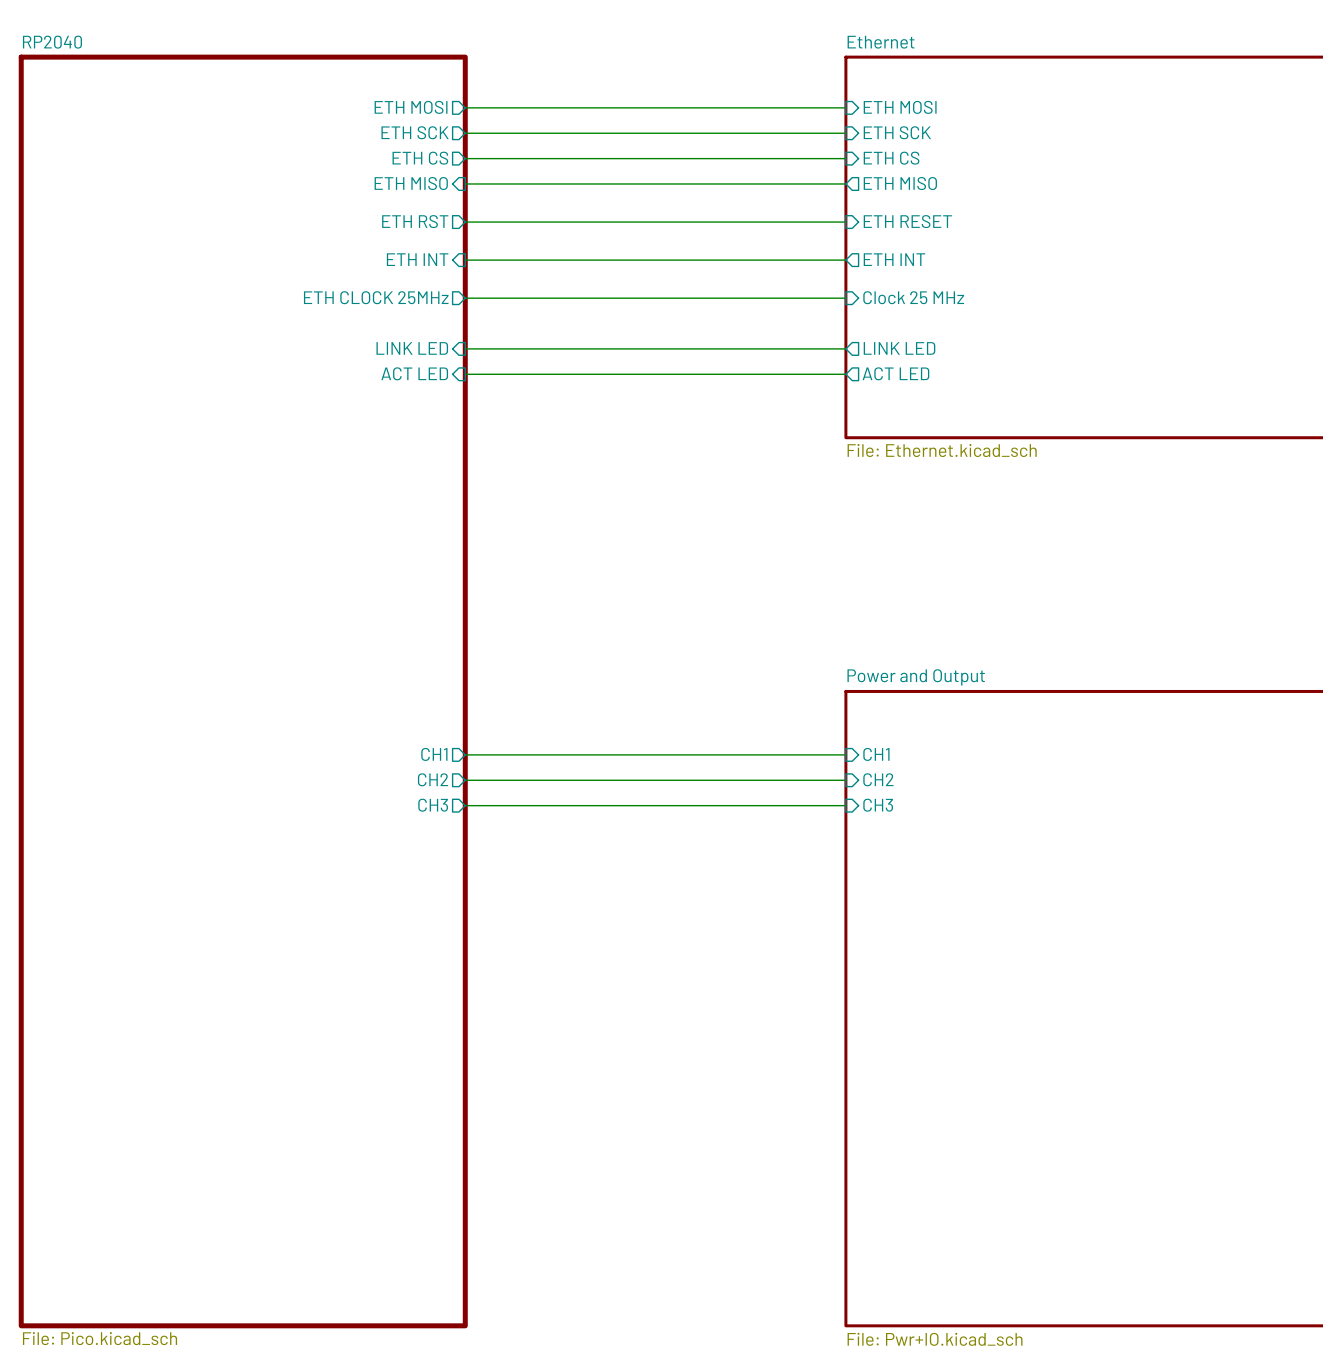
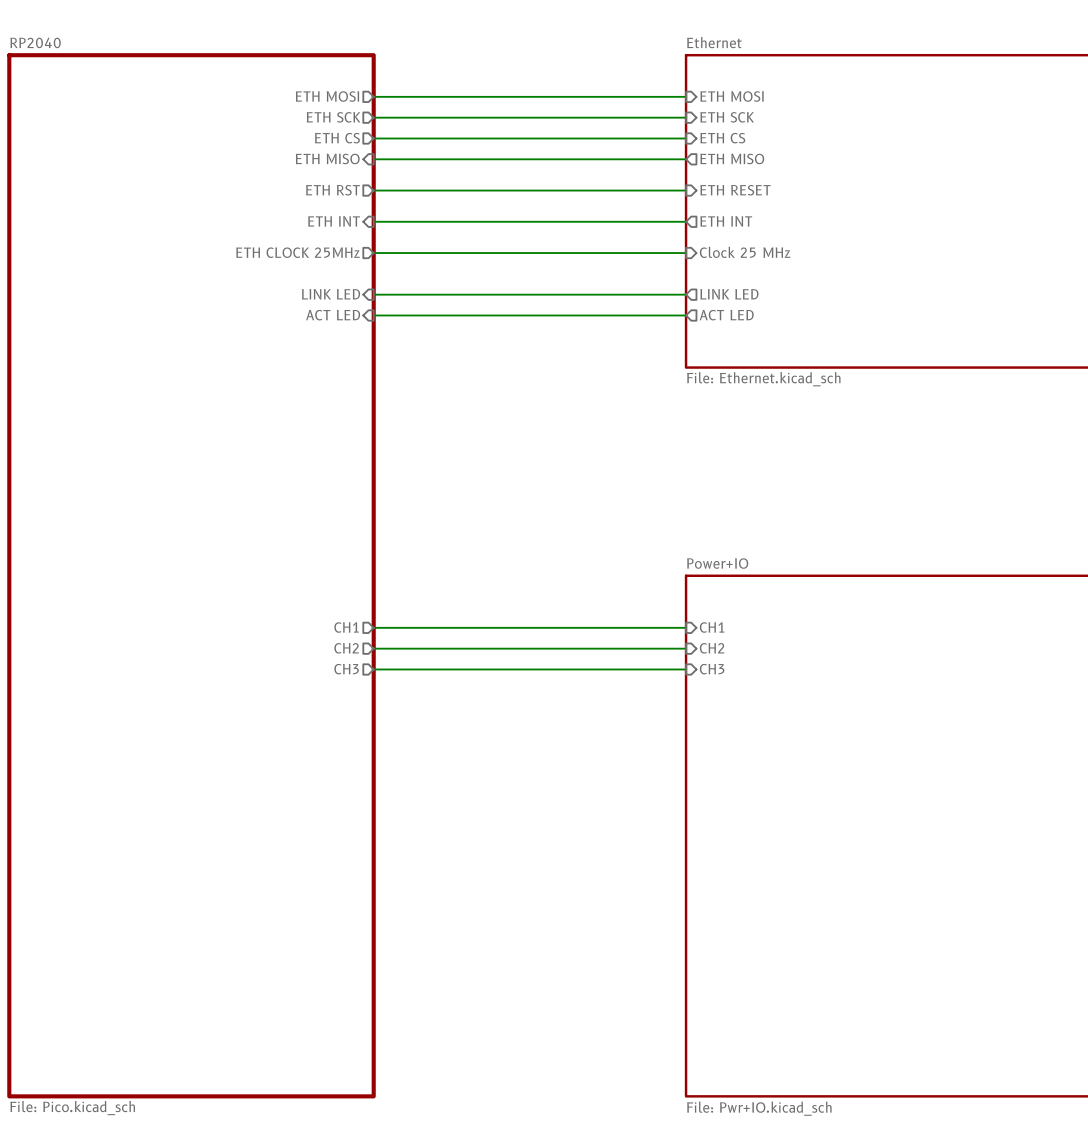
sheet Power and Output name: Power and Output (916, 677) -> Power+IO (717, 563)

